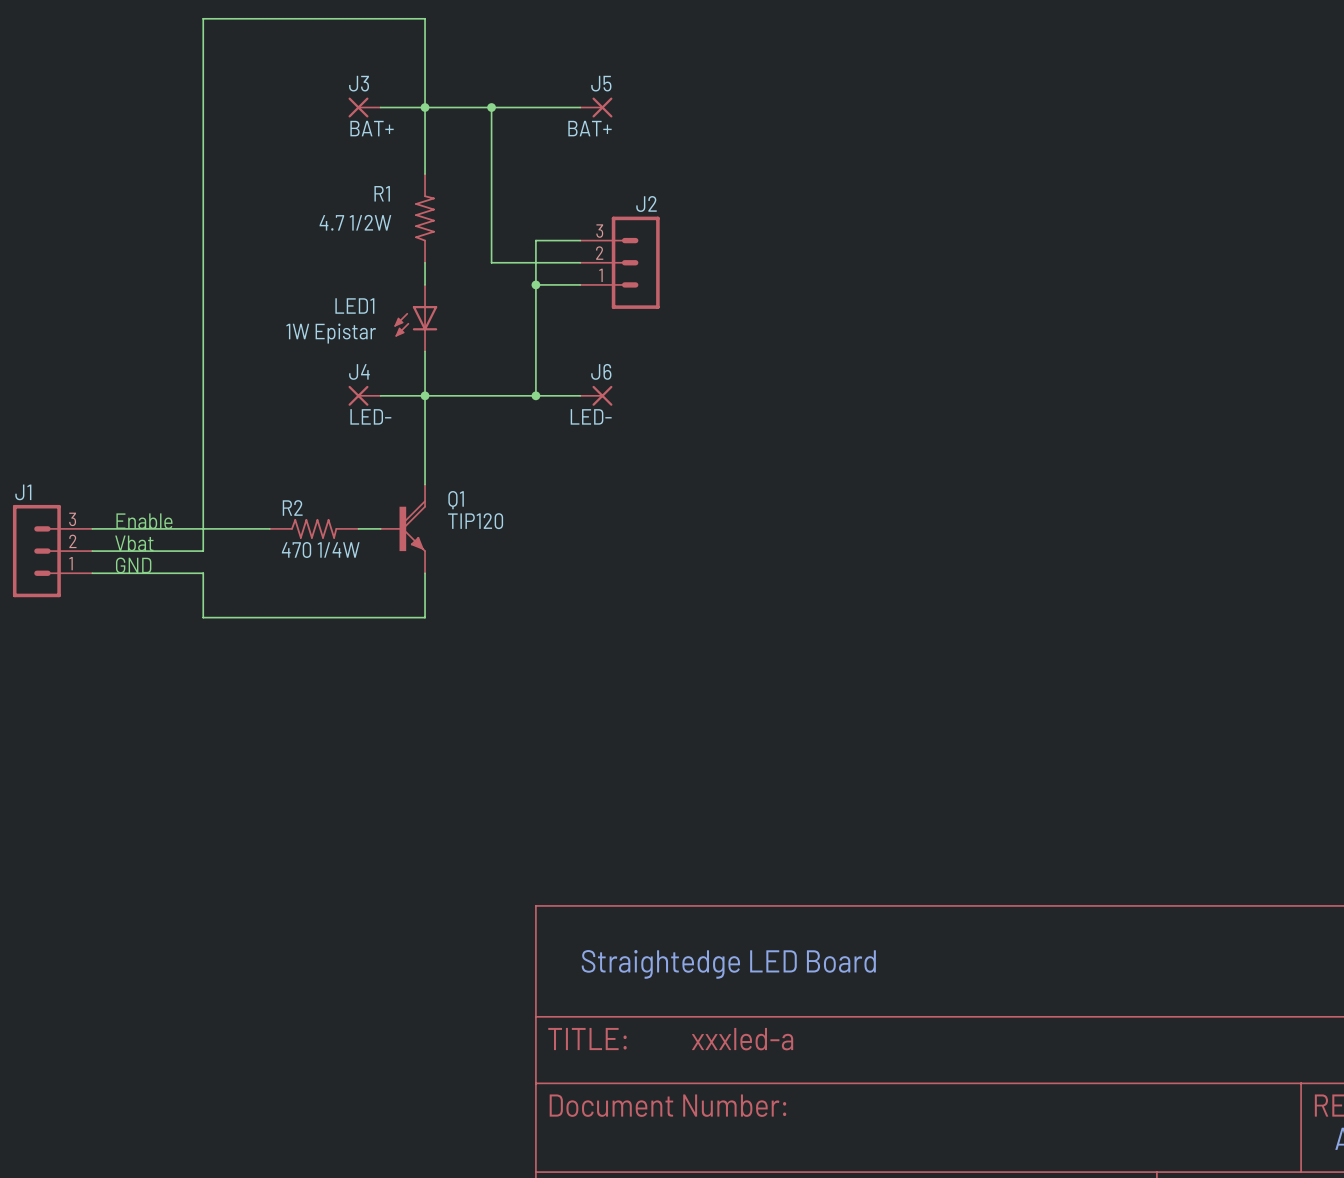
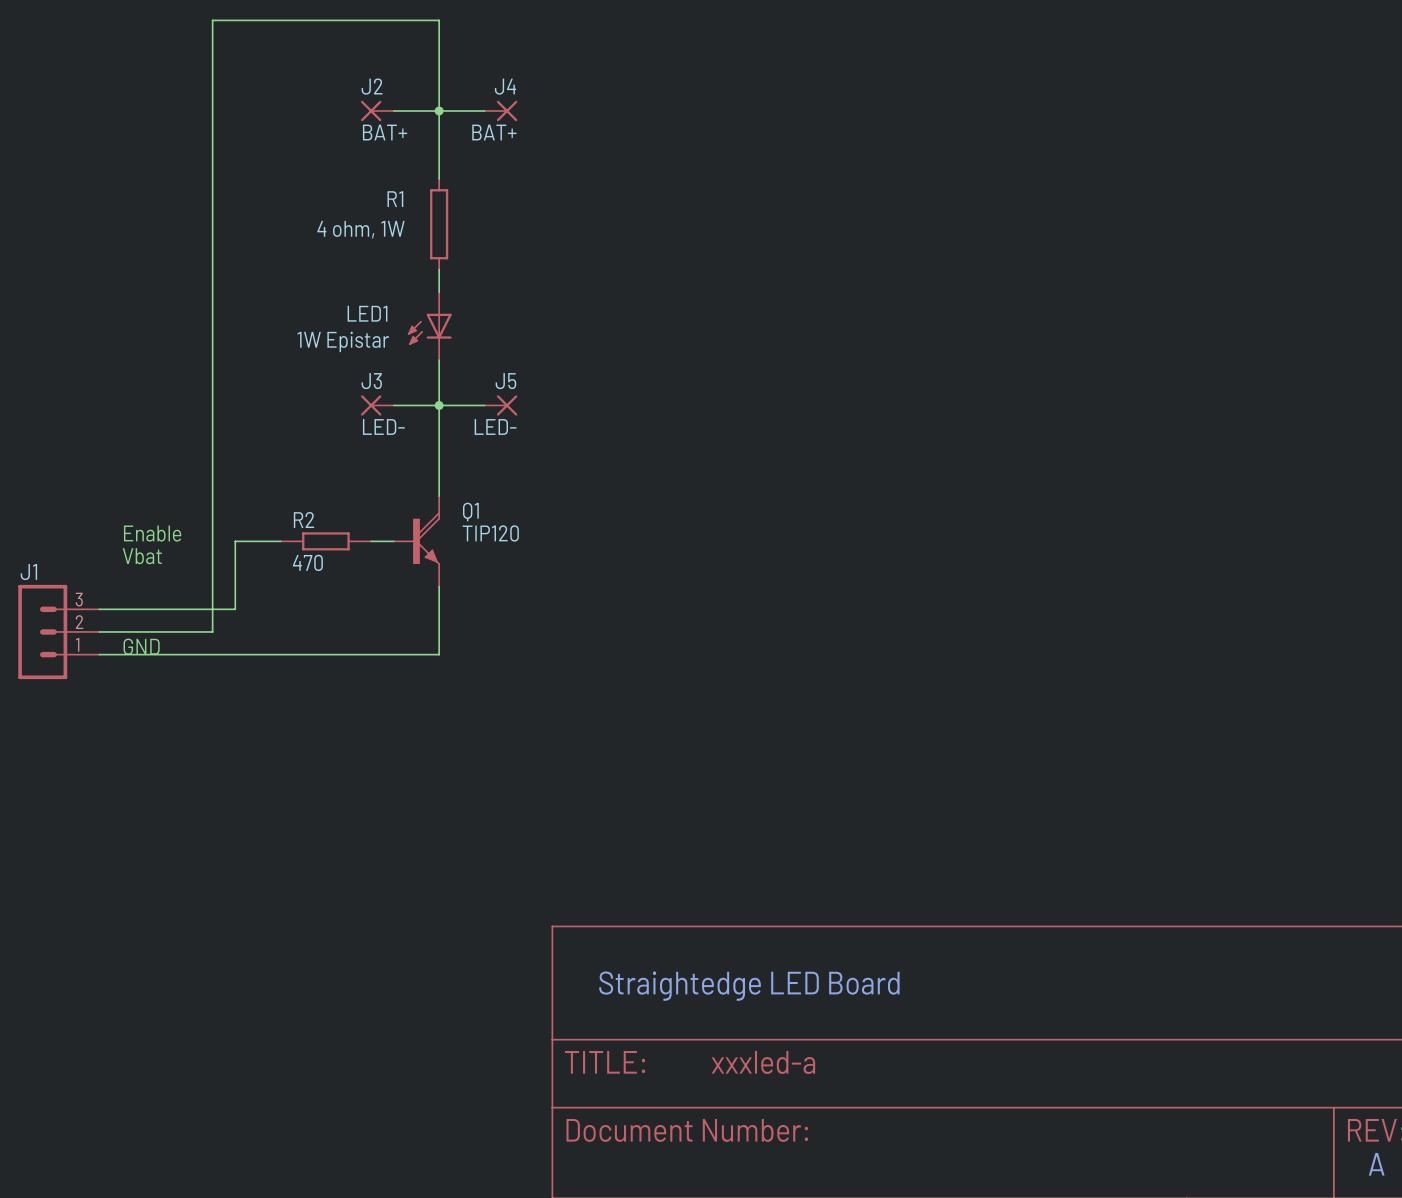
J3 name: J3 (359, 83) -> J2 (372, 86)
wire: (469, 107) (580, 107) -> none
J4: none -> BAT+ (500, 111)
wire: (491, 107) (491, 262) (580, 262) -> none
junction: (491, 107) -> none
J5 position: (596, 107) -> (500, 405)
J5 value: BAT+ (590, 128) -> LED- (495, 426)
R1 symbol: [415, 174, 435, 263] -> [430, 178, 449, 271]
R1 value: 4.7 1/2W (355, 222) -> 4 ohm, 1W (361, 229)
wire: (580, 240) (535, 240) (535, 395) -> none
J2: (619, 262) -> none
wire: (535, 284) (580, 284) -> none
junction: (535, 284) -> none
J4 name: J4 (359, 371) -> J3 (371, 381)
wire: (469, 395) (580, 395) -> none
junction: (535, 395) -> none
J6: LED- (596, 395) -> none
R2 symbol: [269, 519, 359, 539] -> [280, 532, 372, 551]
wire: (92, 528) (225, 528) -> (99, 609) (235, 609) (235, 541)
R2 value: 470 1/4W (320, 549) -> 470 (307, 562)
J1 position: (52, 551) -> (58, 631)
wire: (92, 551) (203, 551) -> (212, 586) (212, 564)
text position: GND (133, 565) -> GND (141, 646)
wire: (92, 573) (203, 573) -> (99, 631) (212, 631)
wire: (203, 617) (425, 617) -> (99, 654) (439, 654) (439, 631)

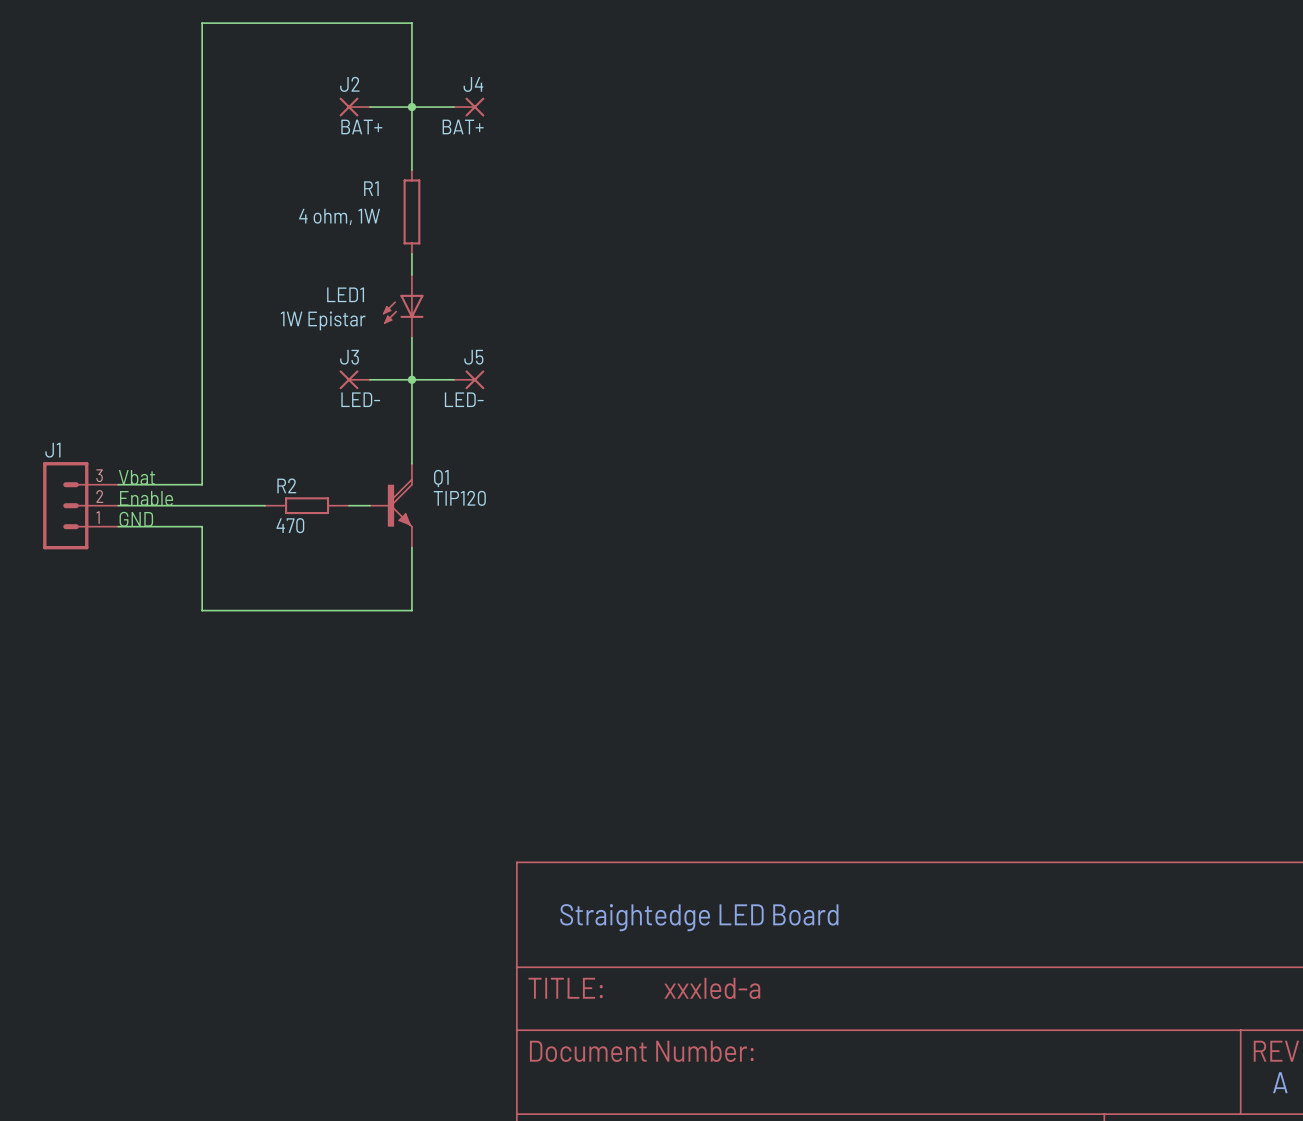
text: none -> Vbat (136, 477)
wire: (212, 518) (212, 564) -> (202, 484) (118, 484)
wire: (235, 541) (235, 609) (99, 609) -> (223, 505) (118, 505)
text: Vbat (142, 556) -> GND (136, 519)
wire: none -> (118, 526) (202, 526)
J1 position: (58, 631) -> (80, 505)
wire: (99, 631) (212, 631) -> (202, 610) (202, 589)
text: GND (141, 646) -> none
wire: (99, 654) (212, 654) -> none

